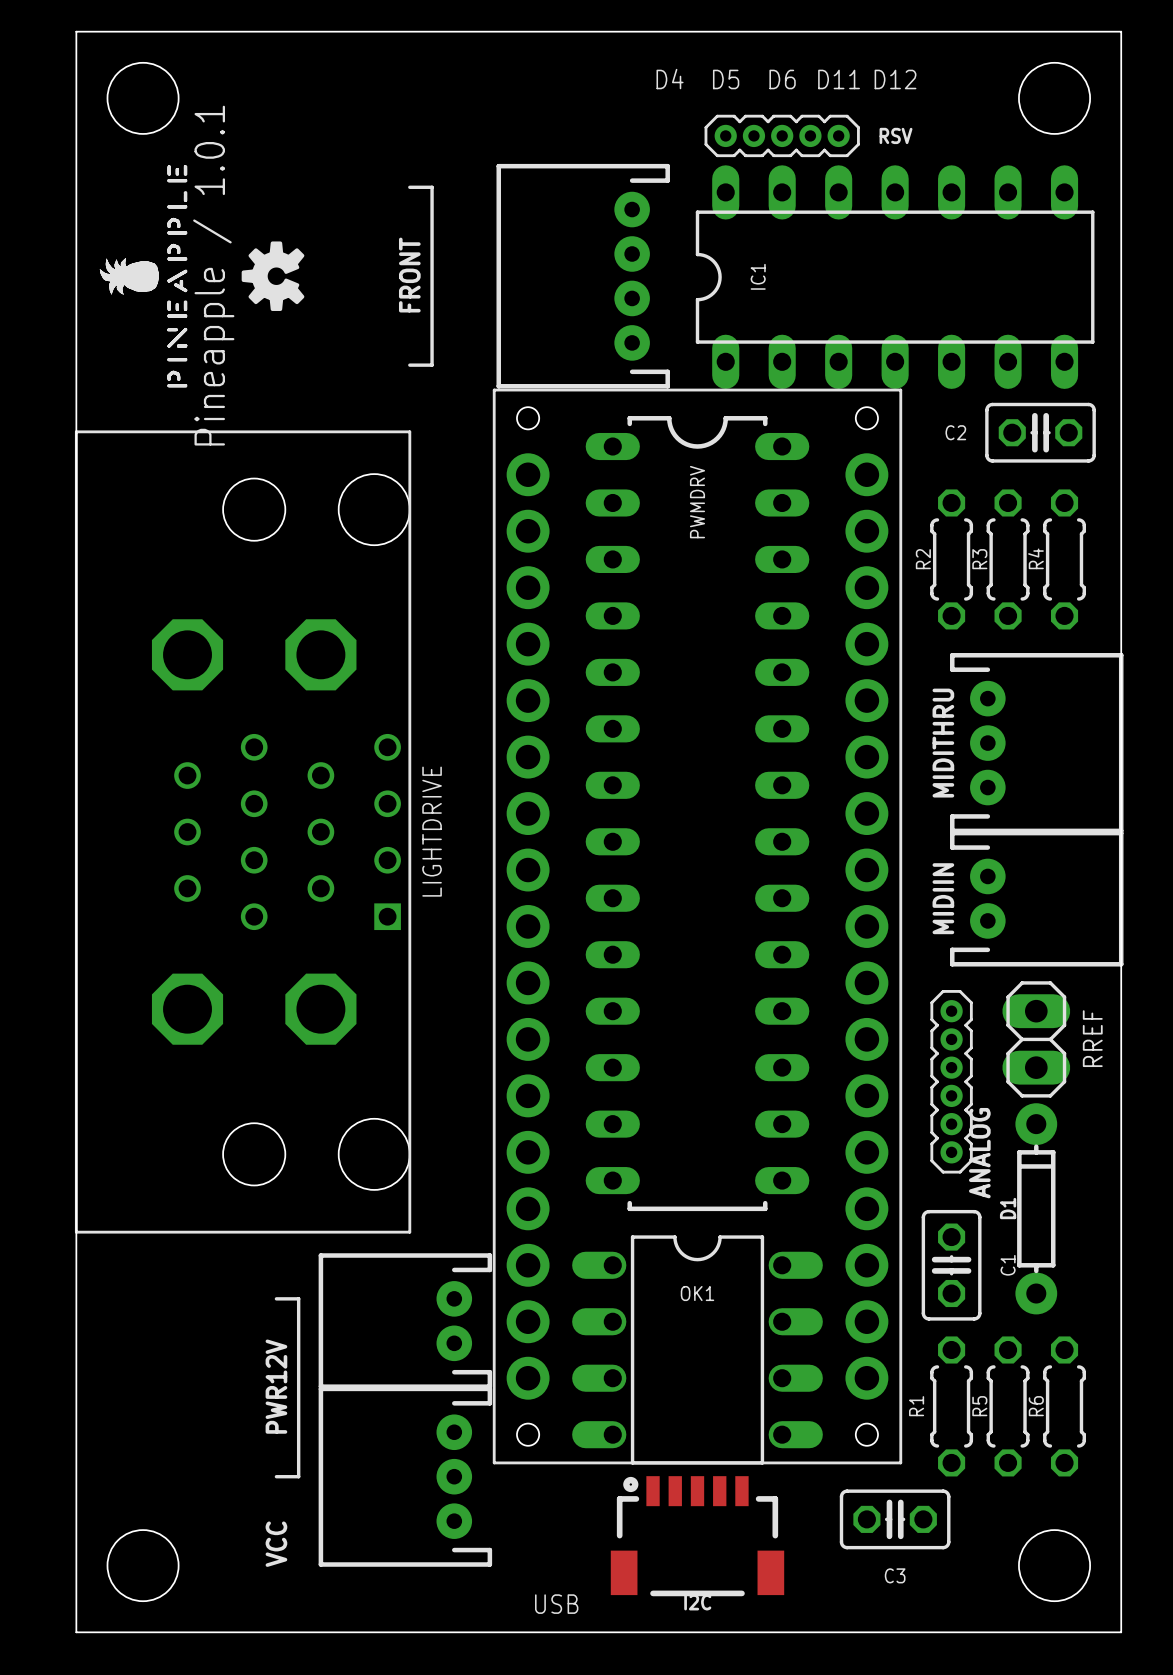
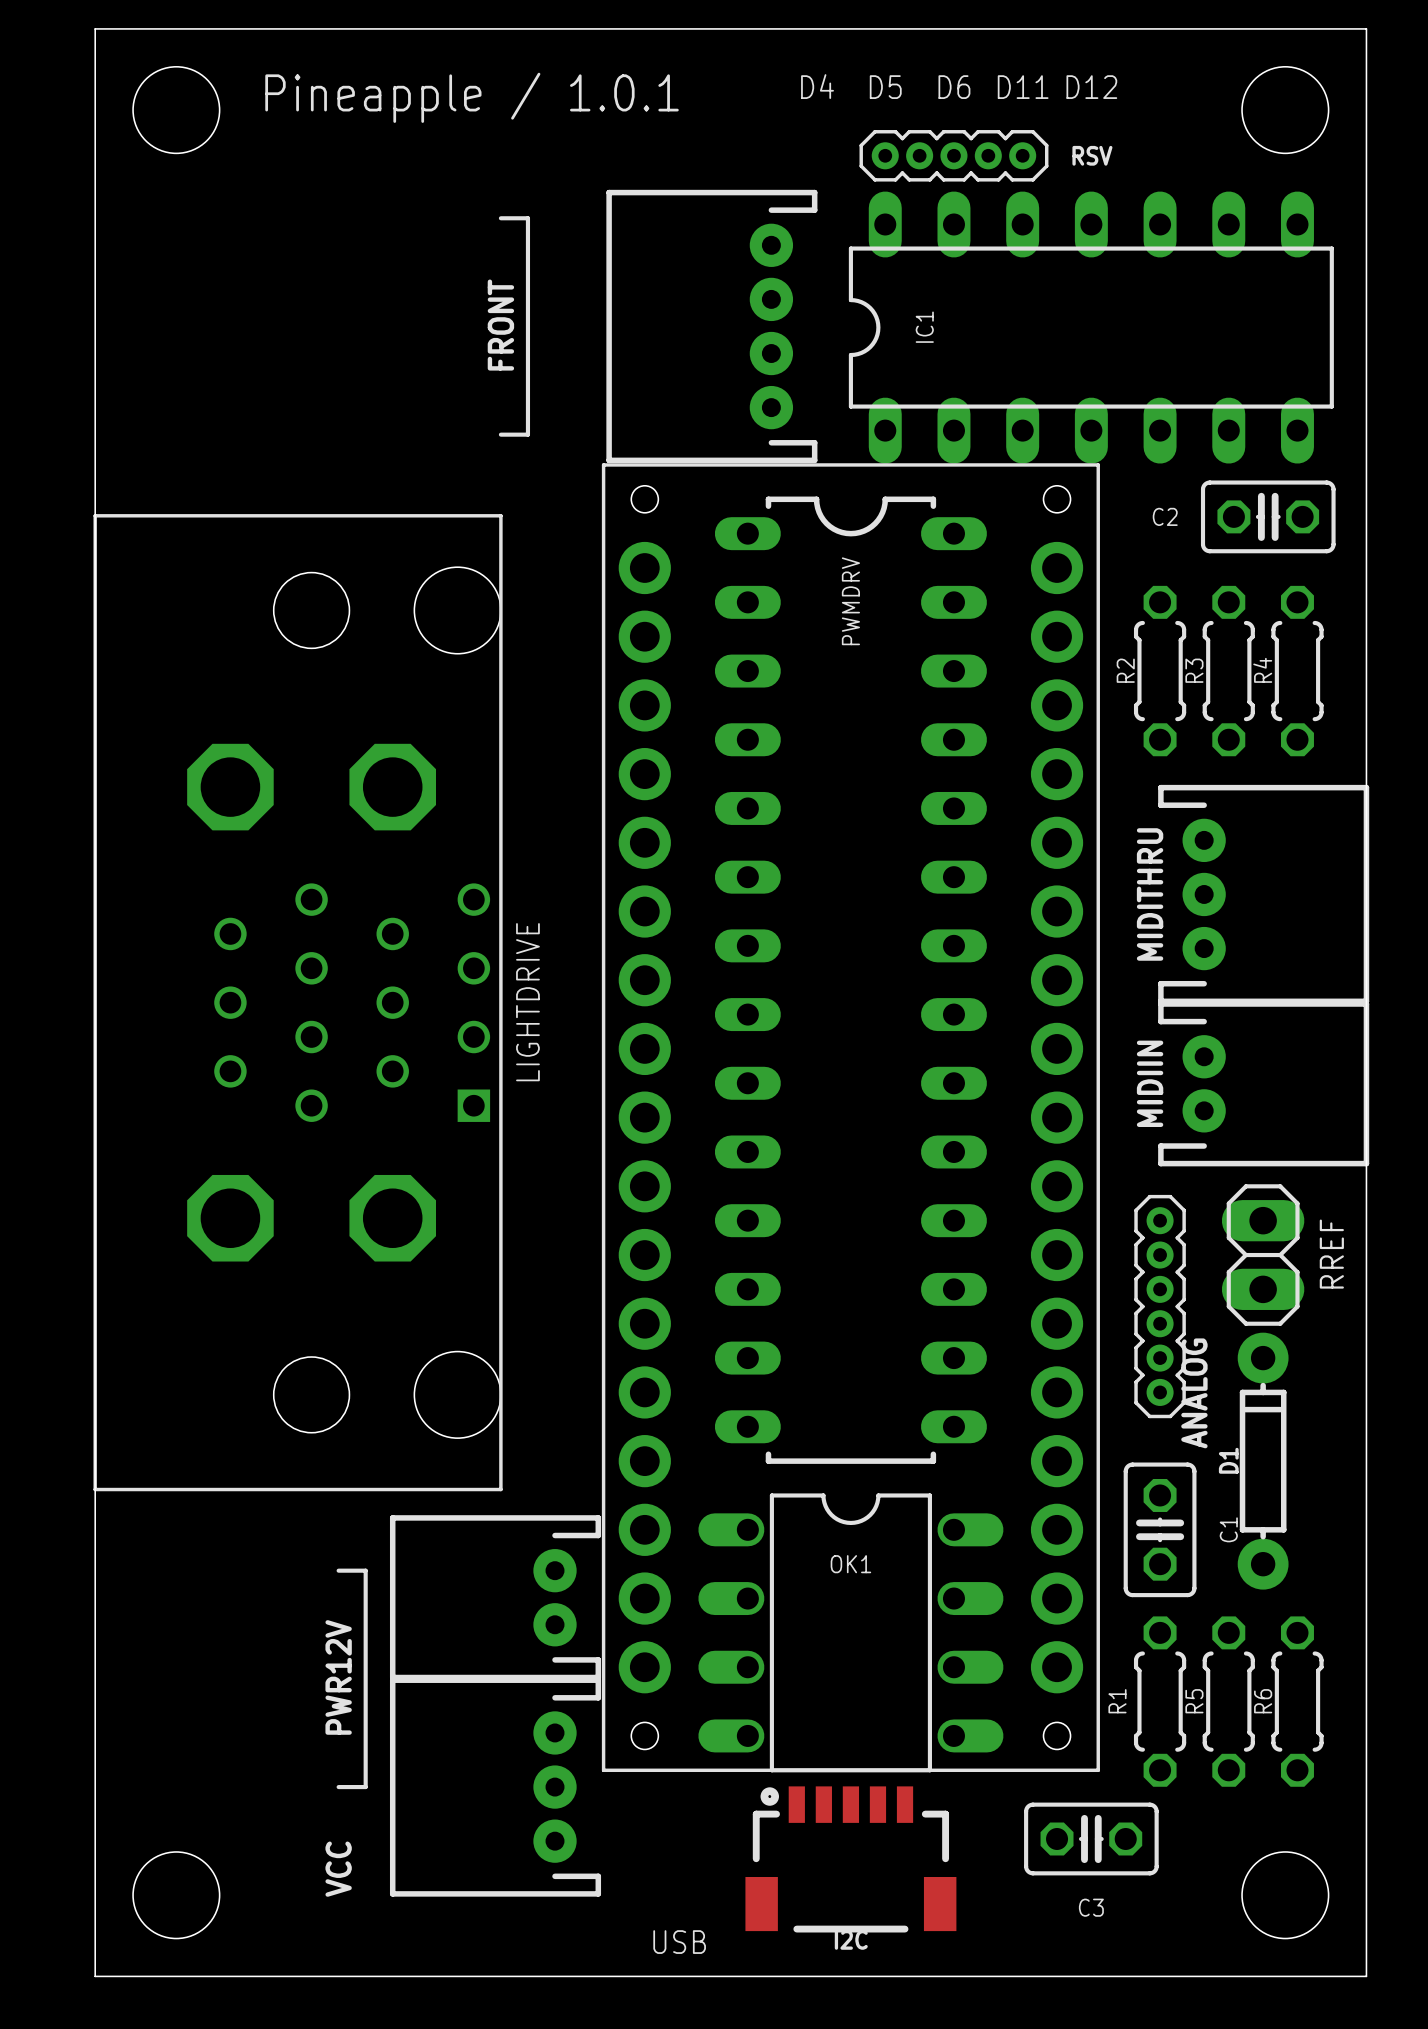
drawing: [99, 165, 188, 388] -> none
drawing: [241, 241, 305, 311] -> none
text rotation: 0° (213, 275) -> 90° clockwise (472, 97)

